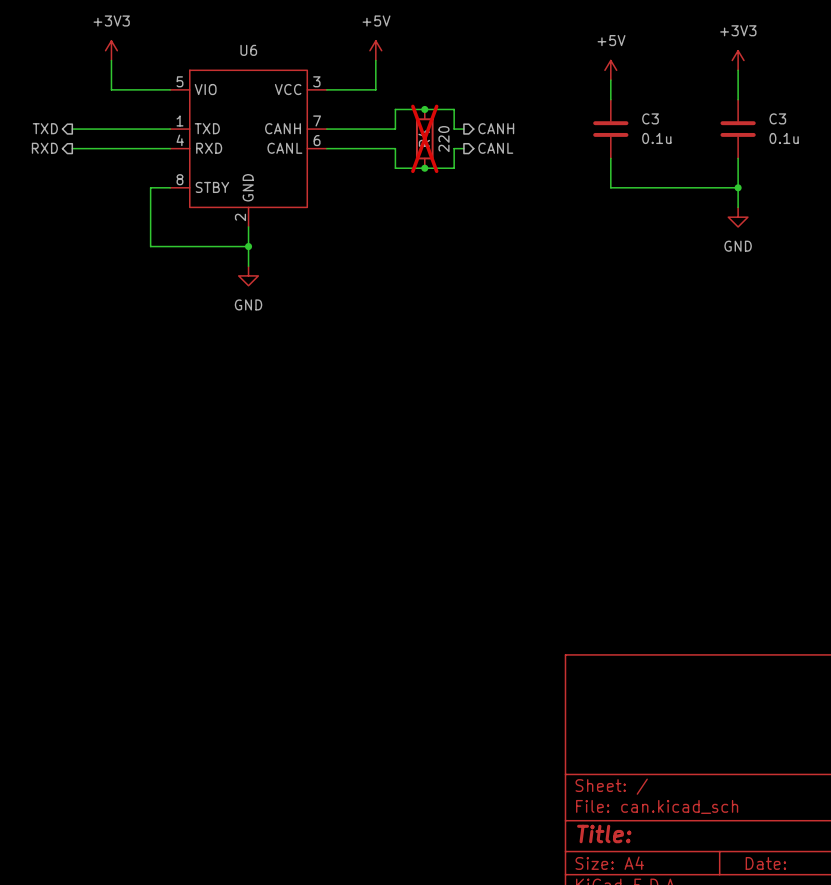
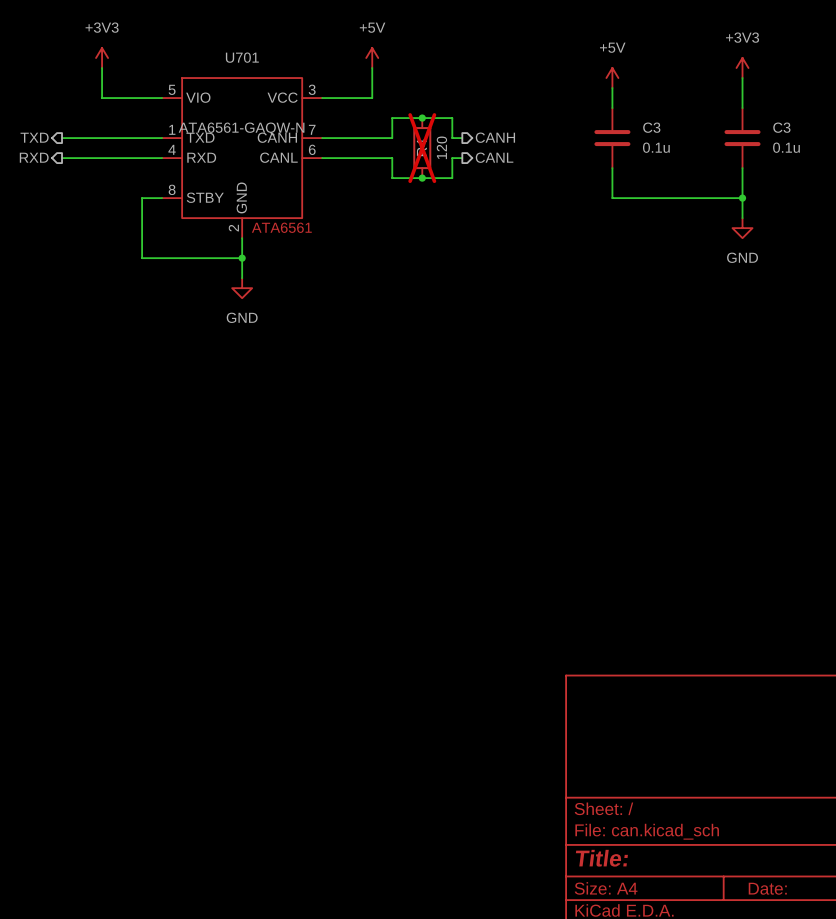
U6 name: U6 (248, 50) -> U701 (242, 57)
U6 value: none -> ATA6561-GAQW-N (241, 128)
part value: 220 (444, 139) -> 120 (441, 147)
U6 text: none -> ATA6561 (281, 227)

